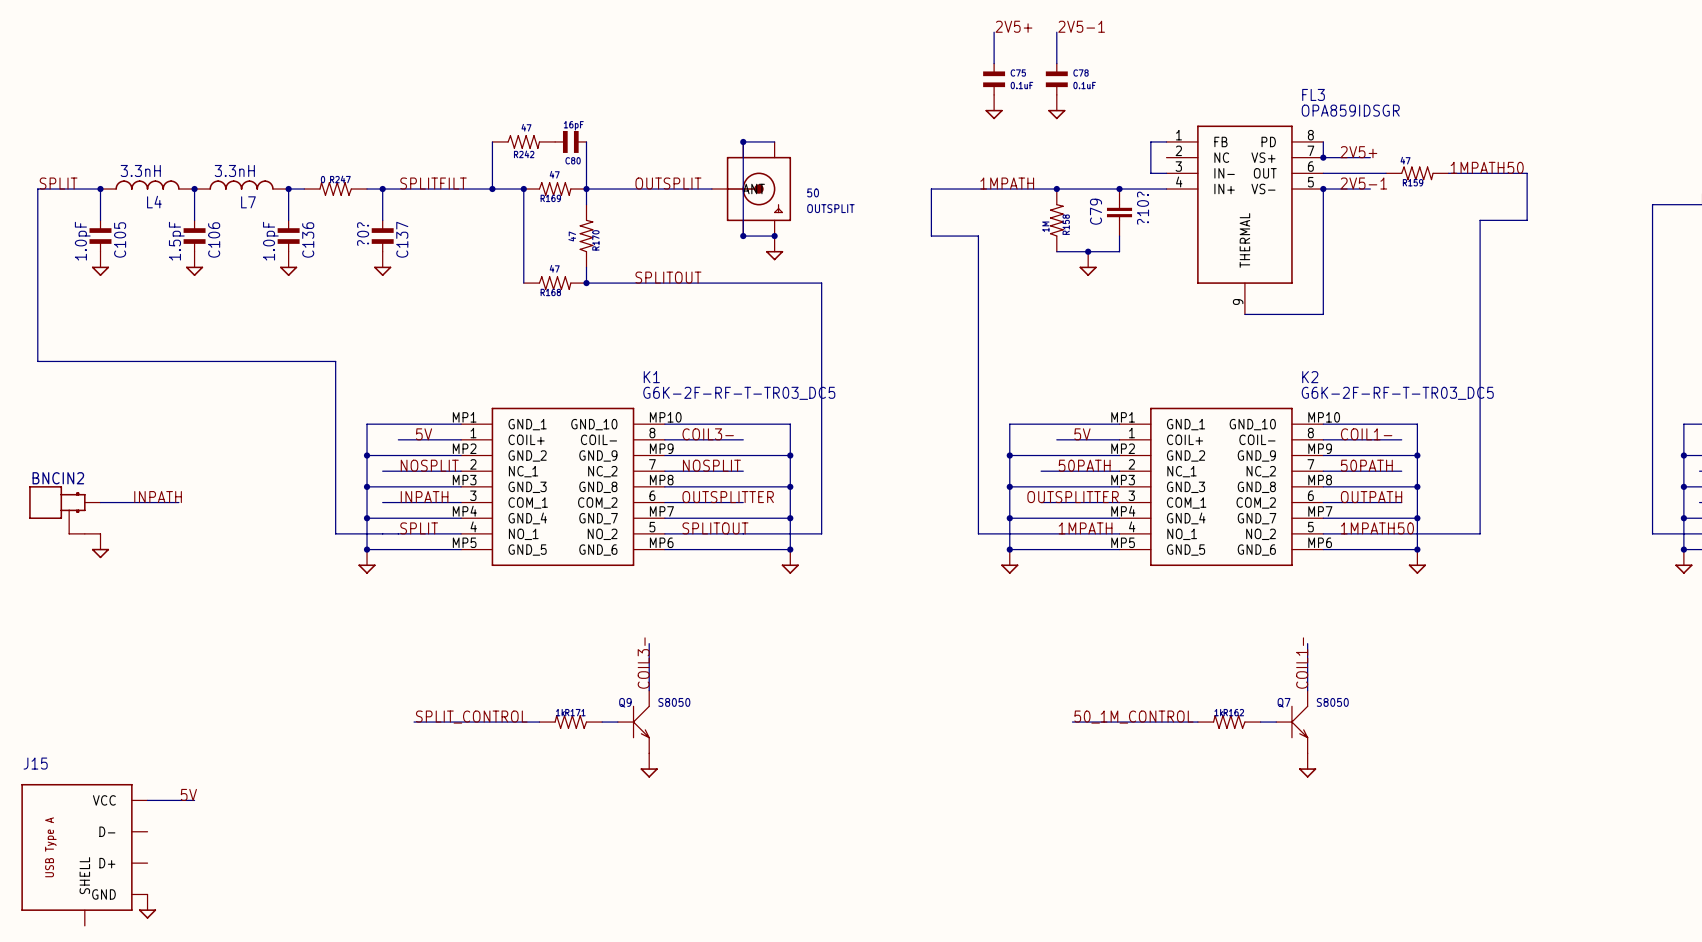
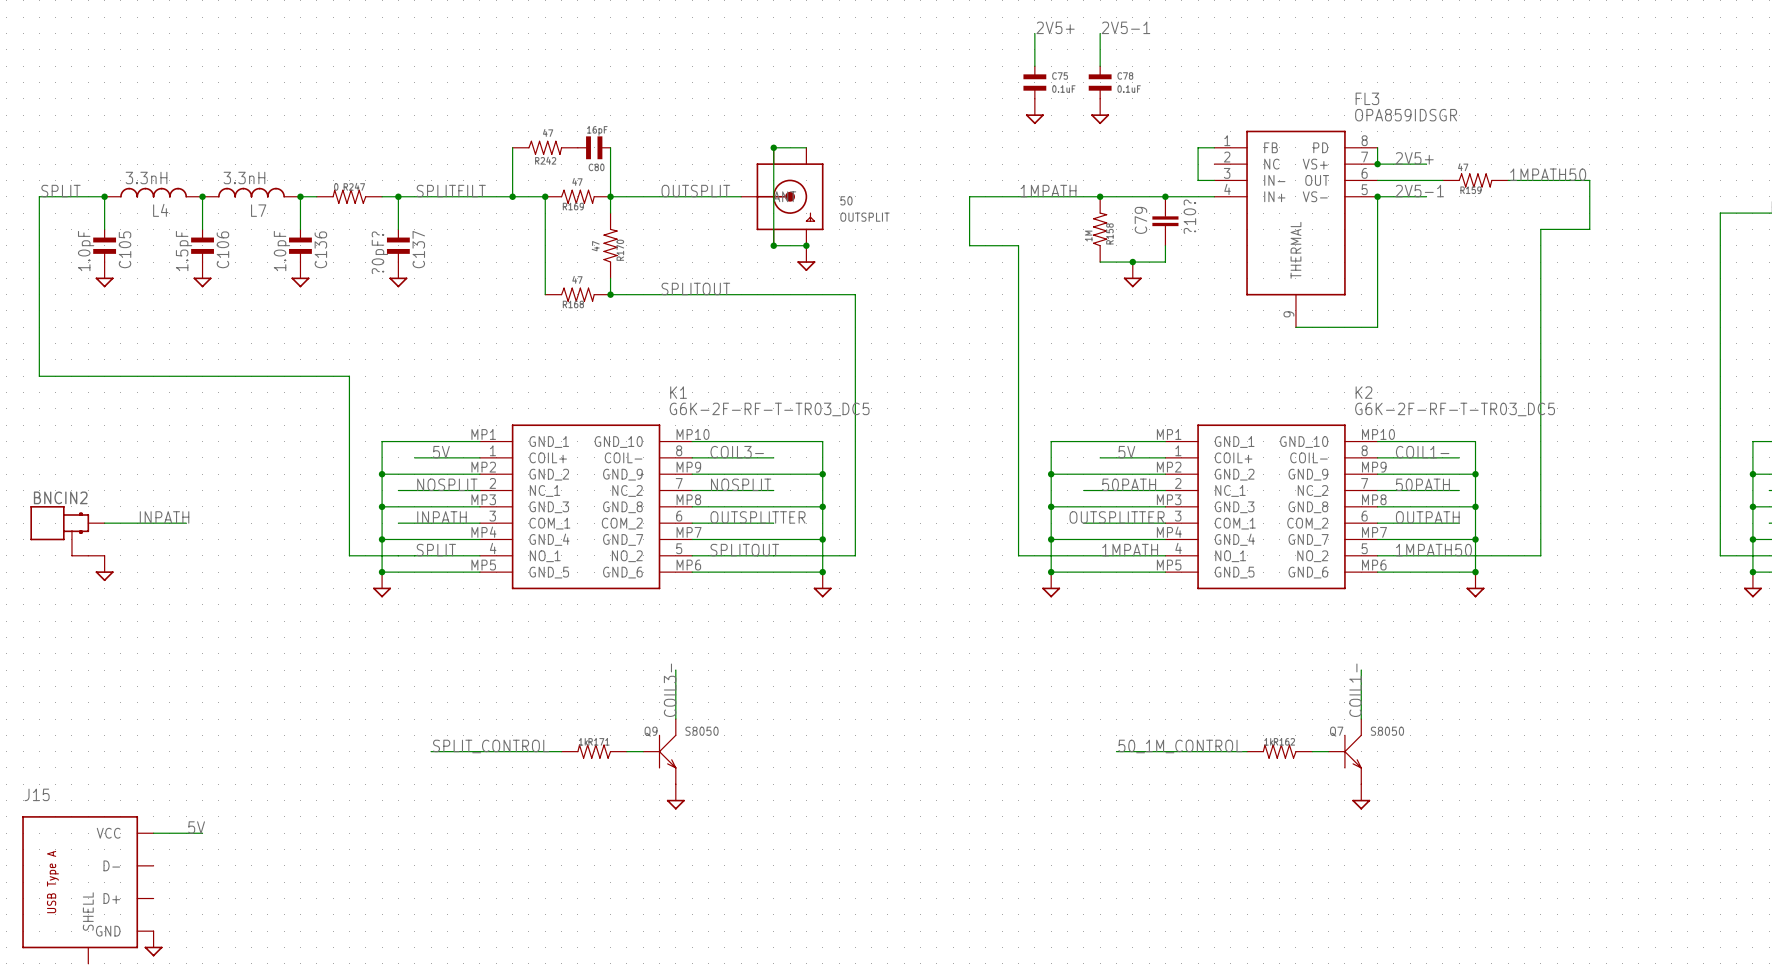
C137 value: ?0? (363, 234) -> ?0pF? (379, 252)

